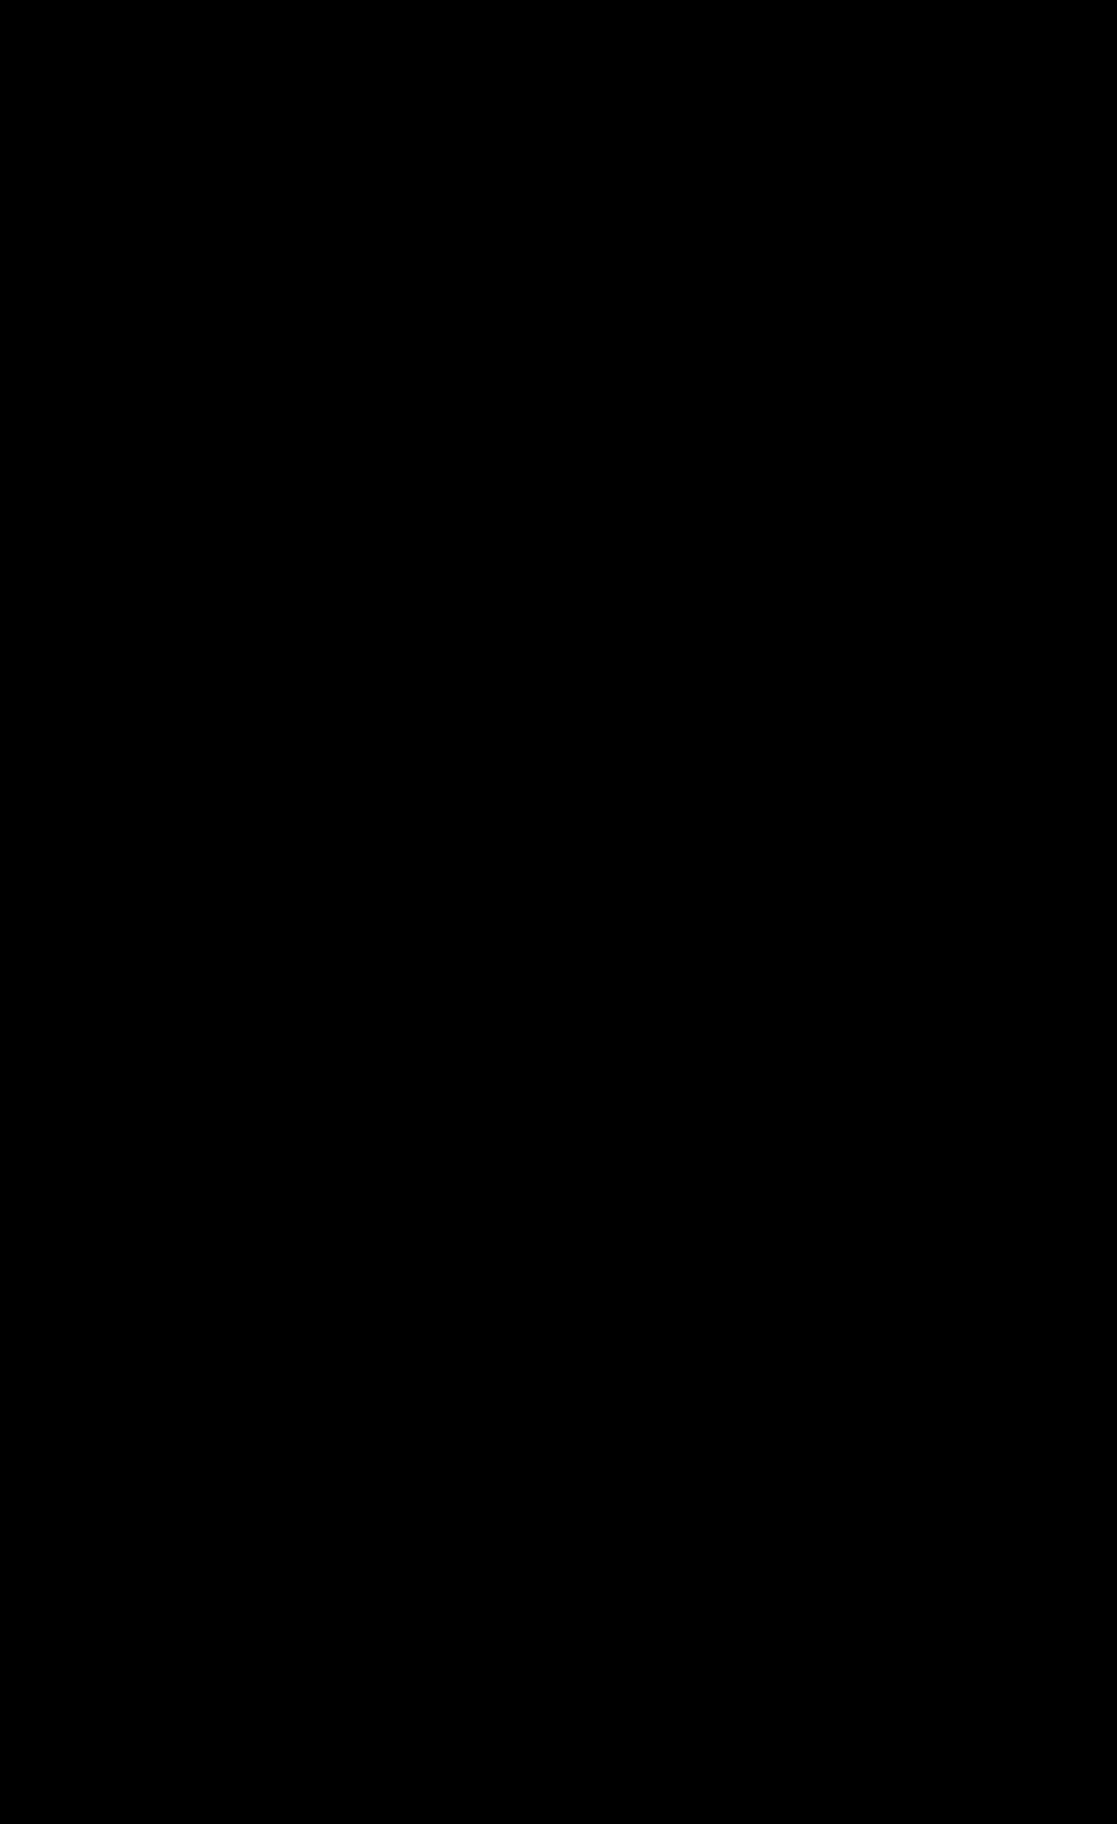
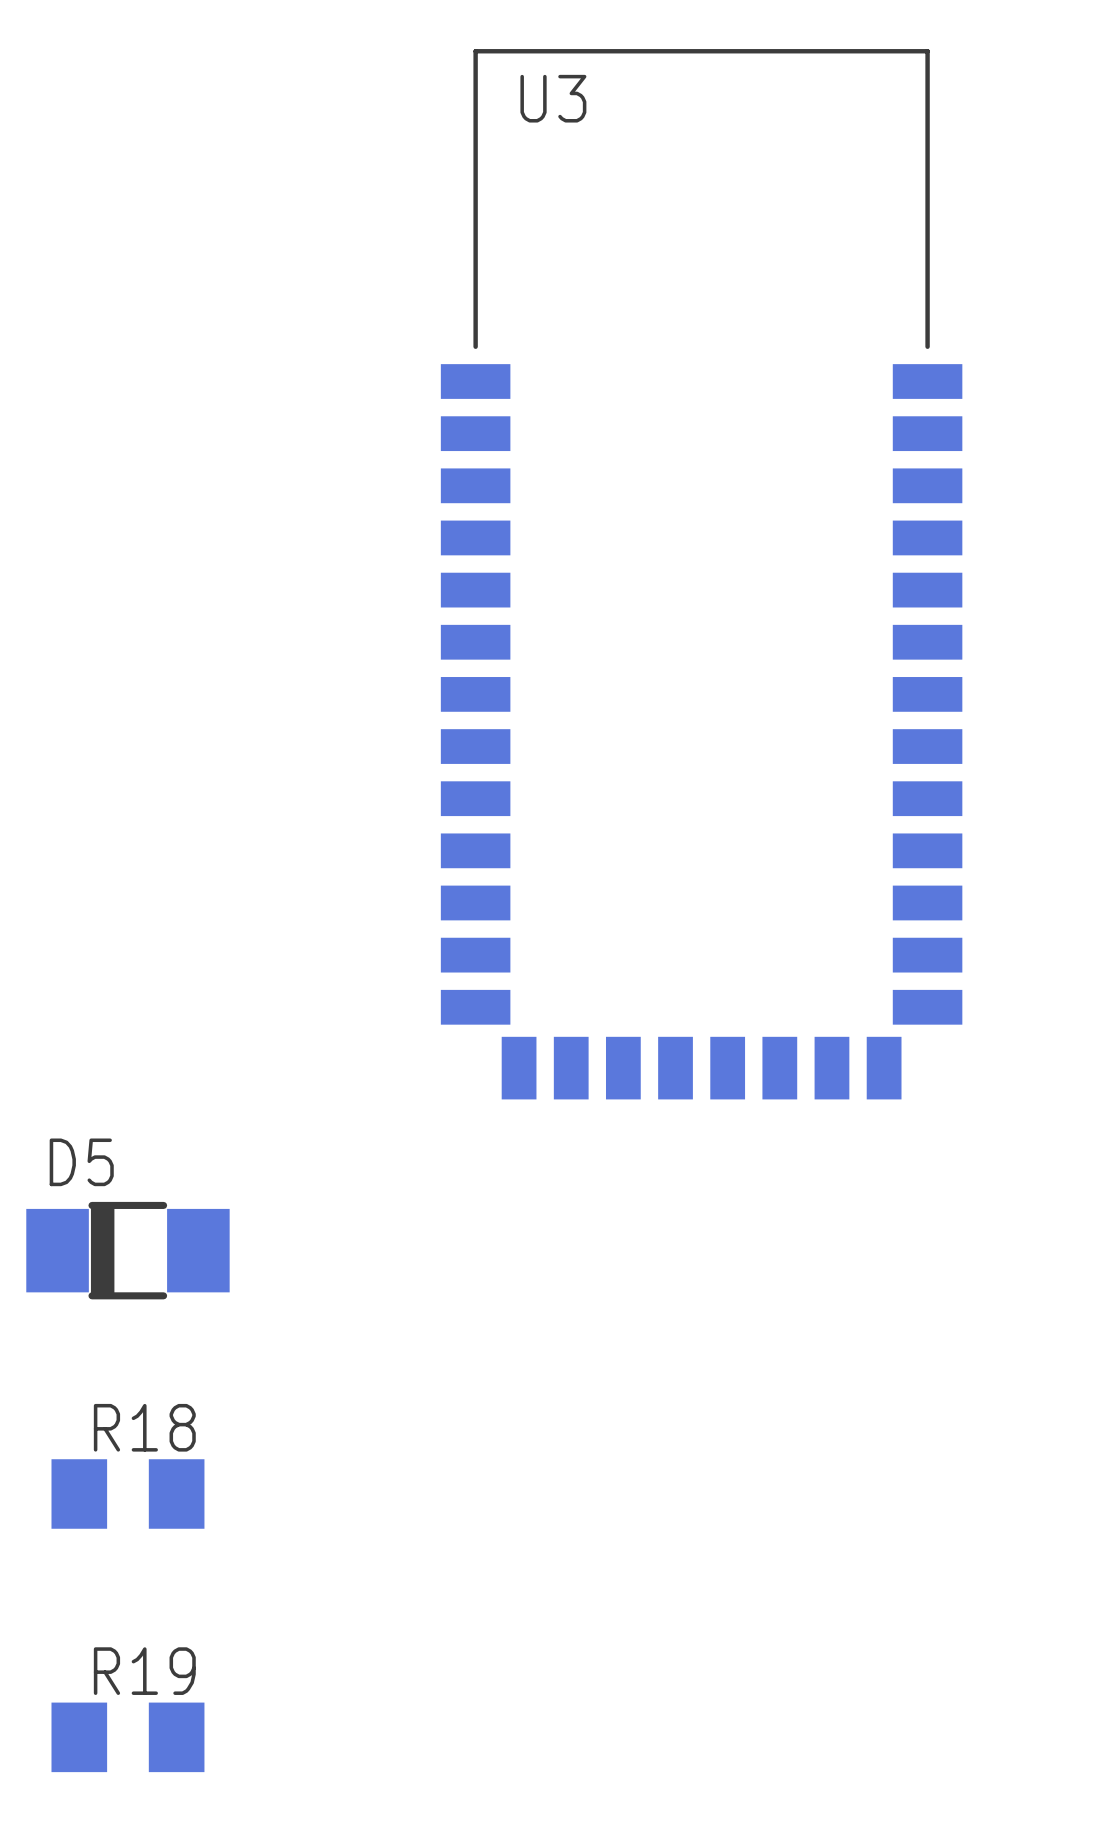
U3: none -> (701, 574)
D5: none -> (127, 1250)
R18: none -> (127, 1493)
R19: none -> (127, 1737)

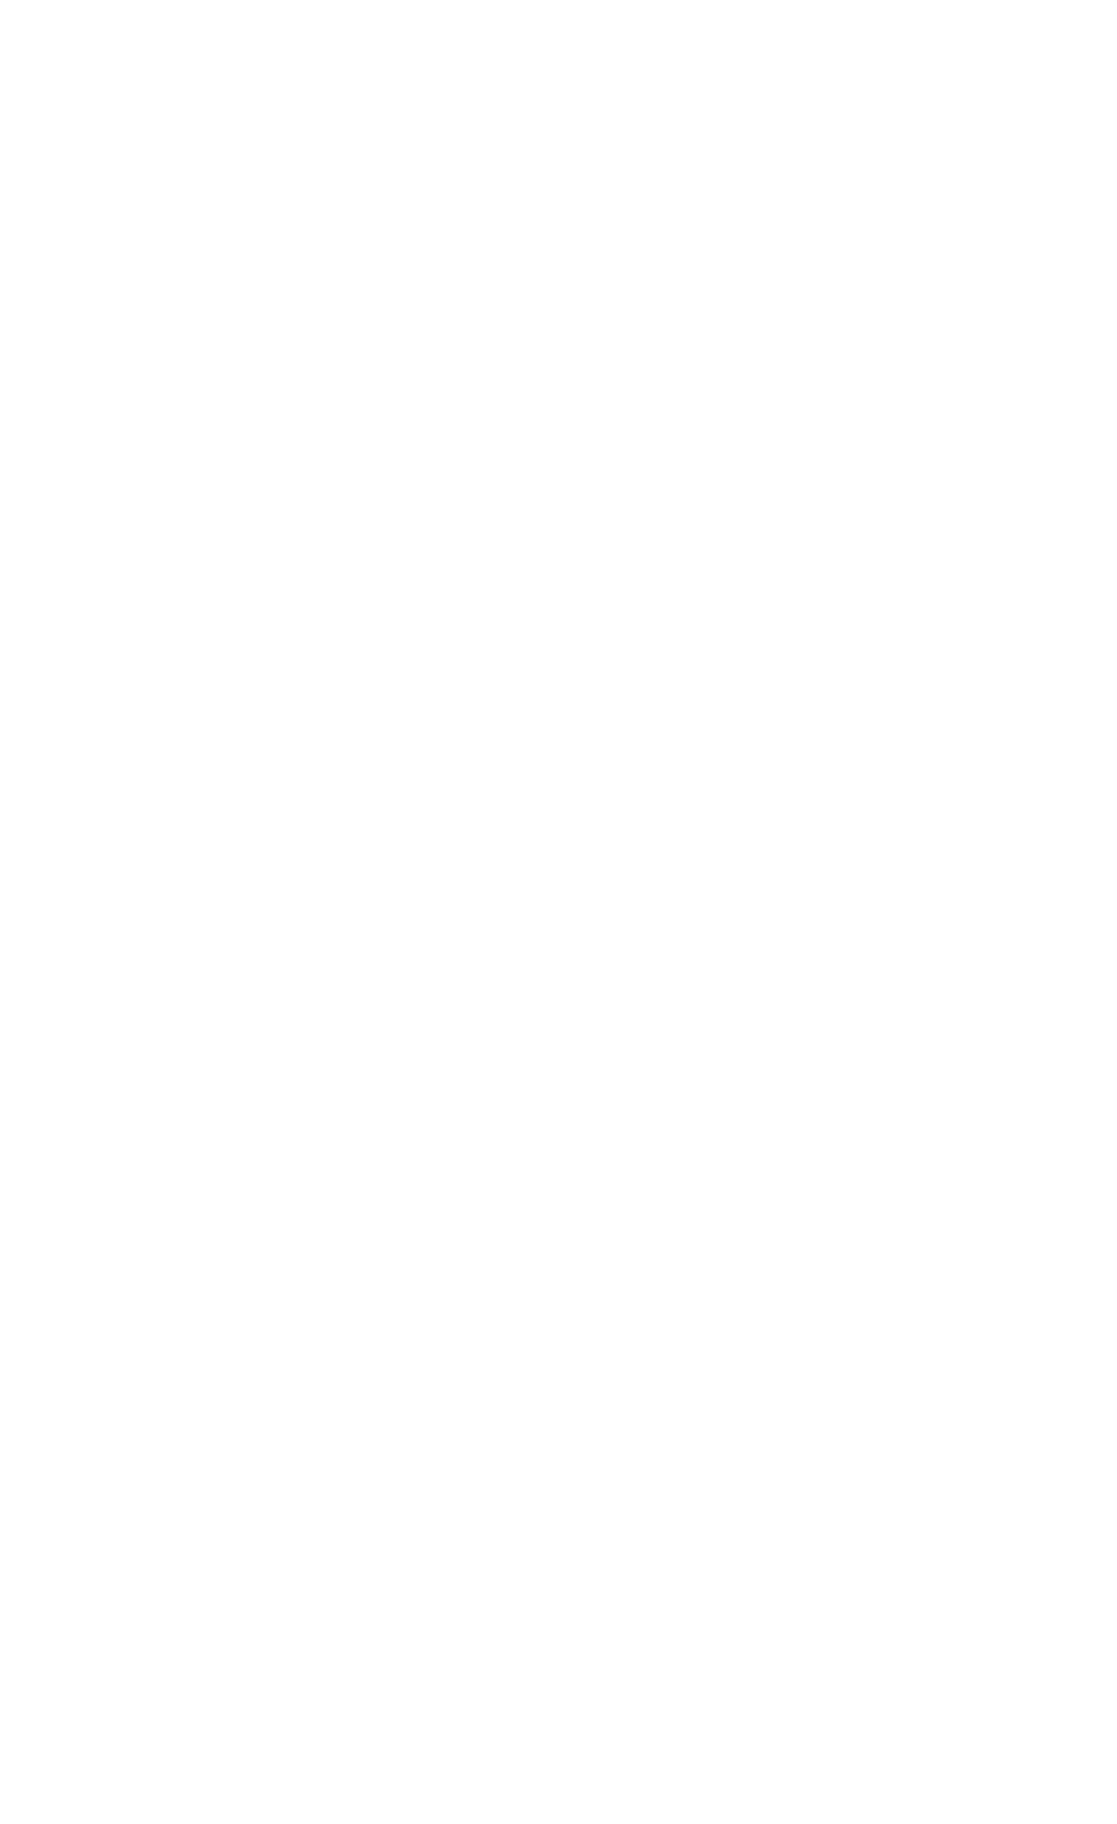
U3: (701, 574) -> none
D5: (127, 1250) -> none
R18: (127, 1493) -> none
R19: (127, 1737) -> none

